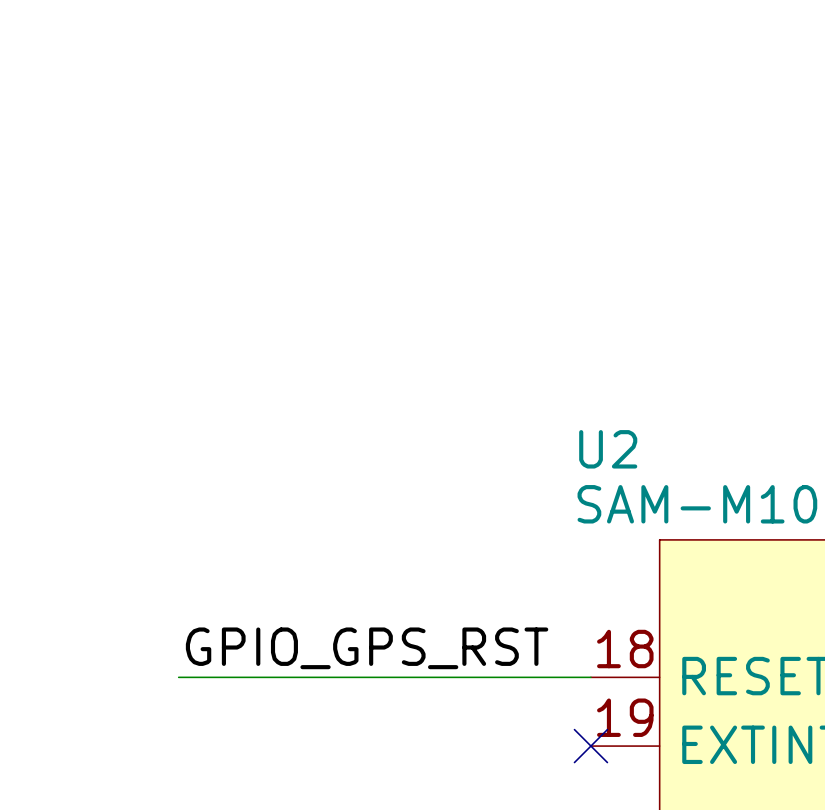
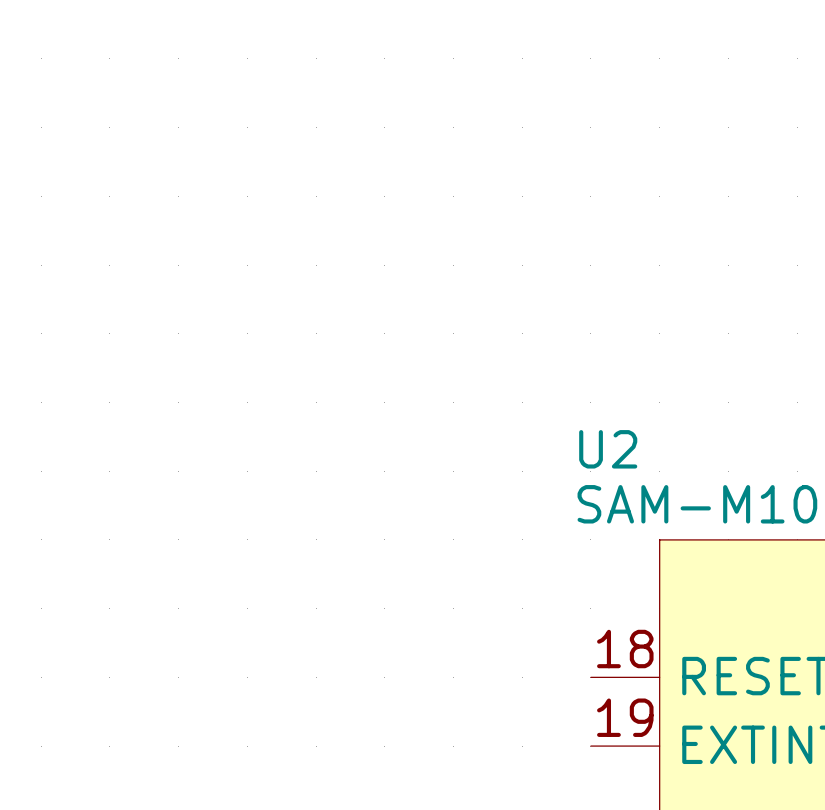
label: GPIO_GPS_RST (367, 648) -> none
wire: (178, 677) (590, 677) -> none
no-connect mark: (590, 746) -> none

